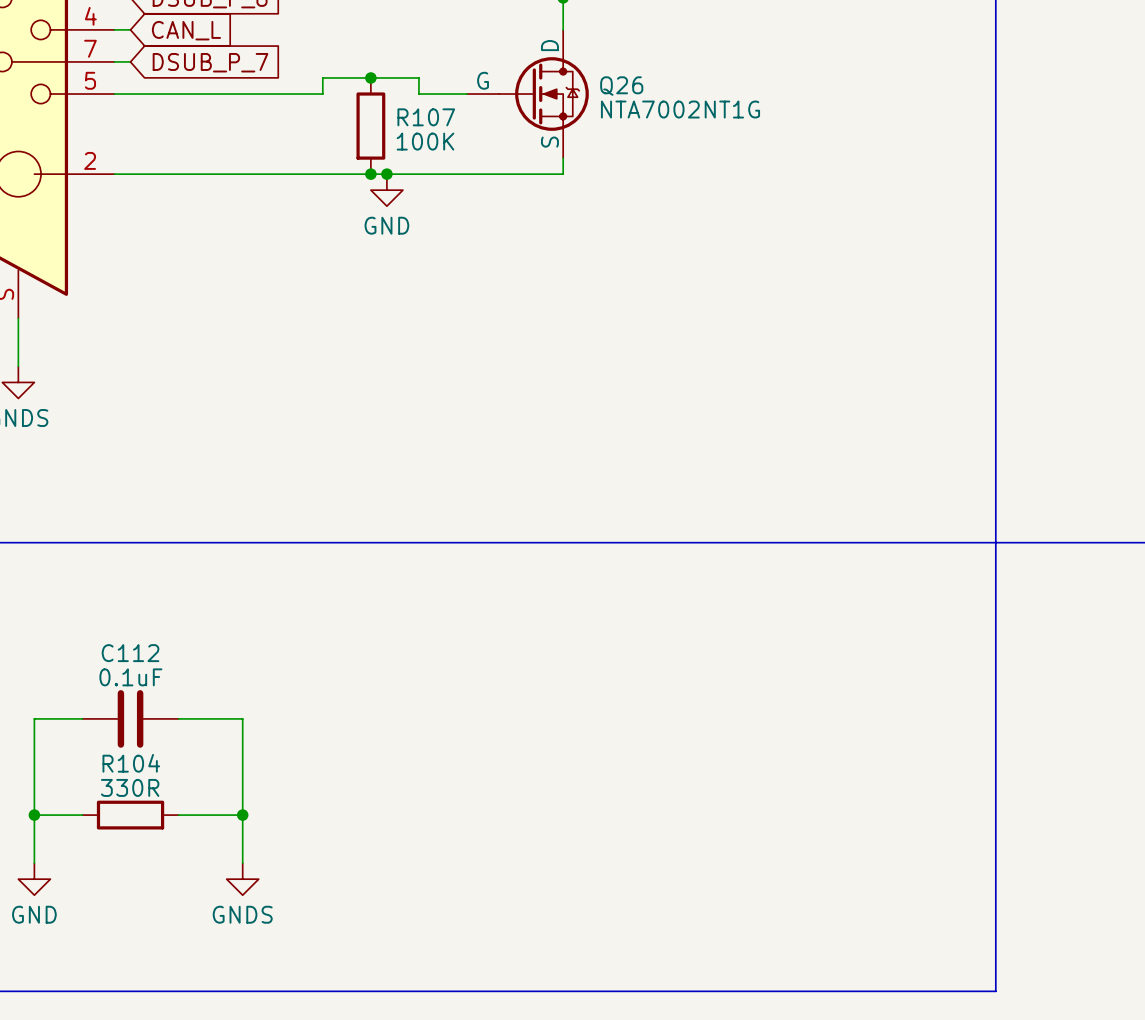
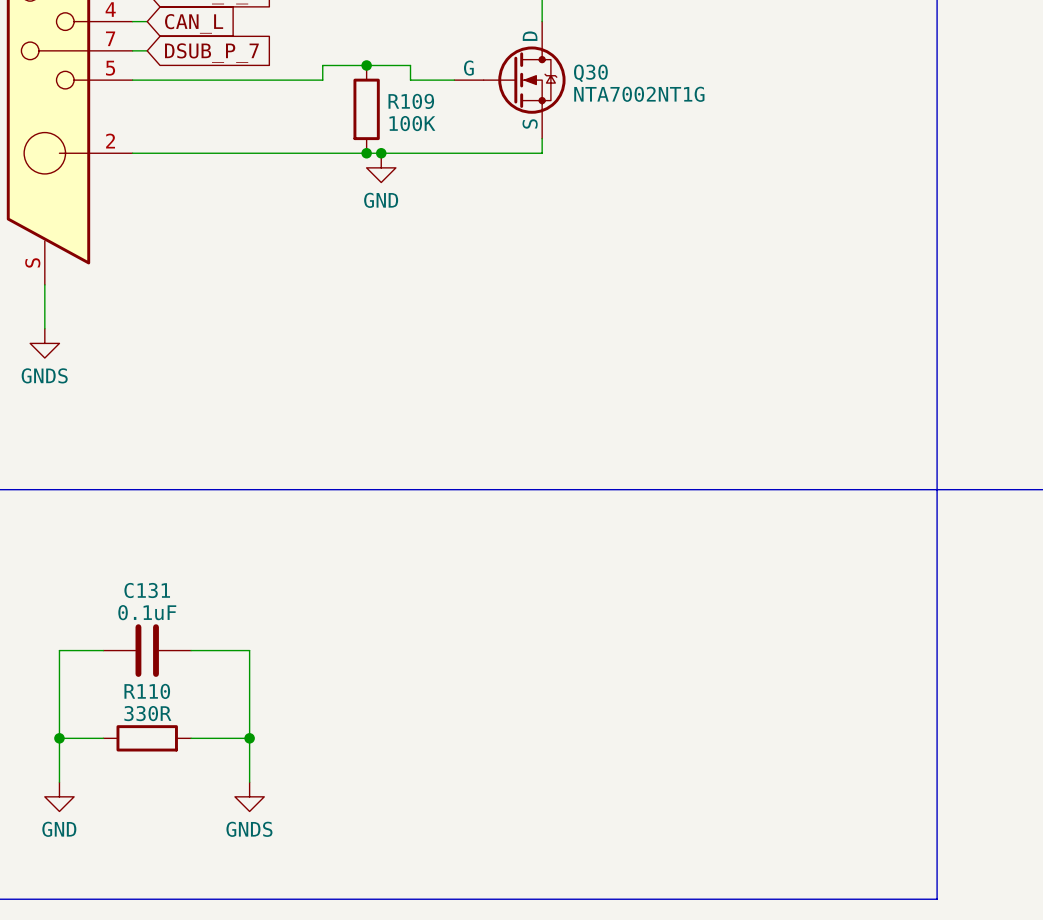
Q26 name: Q26 (621, 86) -> Q30 (590, 73)
R107 name: R107 (426, 117) -> R109 (411, 101)
C112 name: C112 (130, 653) -> C131 (147, 590)
R104 name: R104 (131, 763) -> R110 (147, 691)

